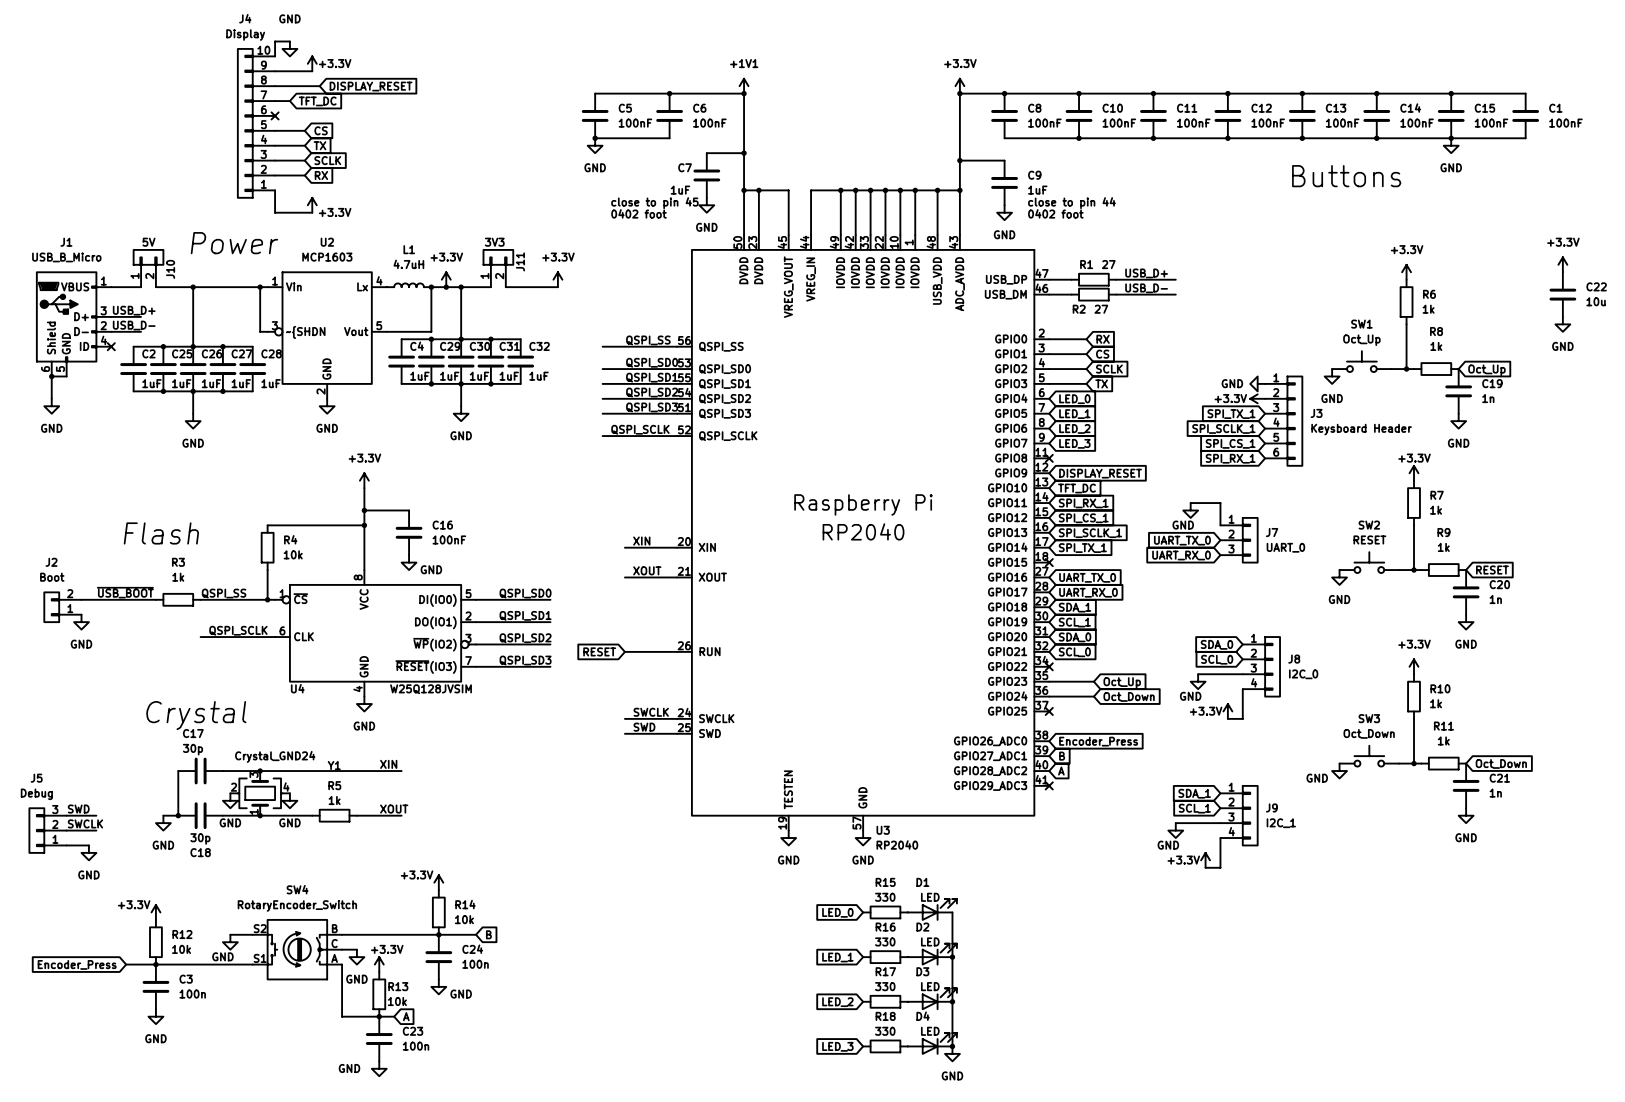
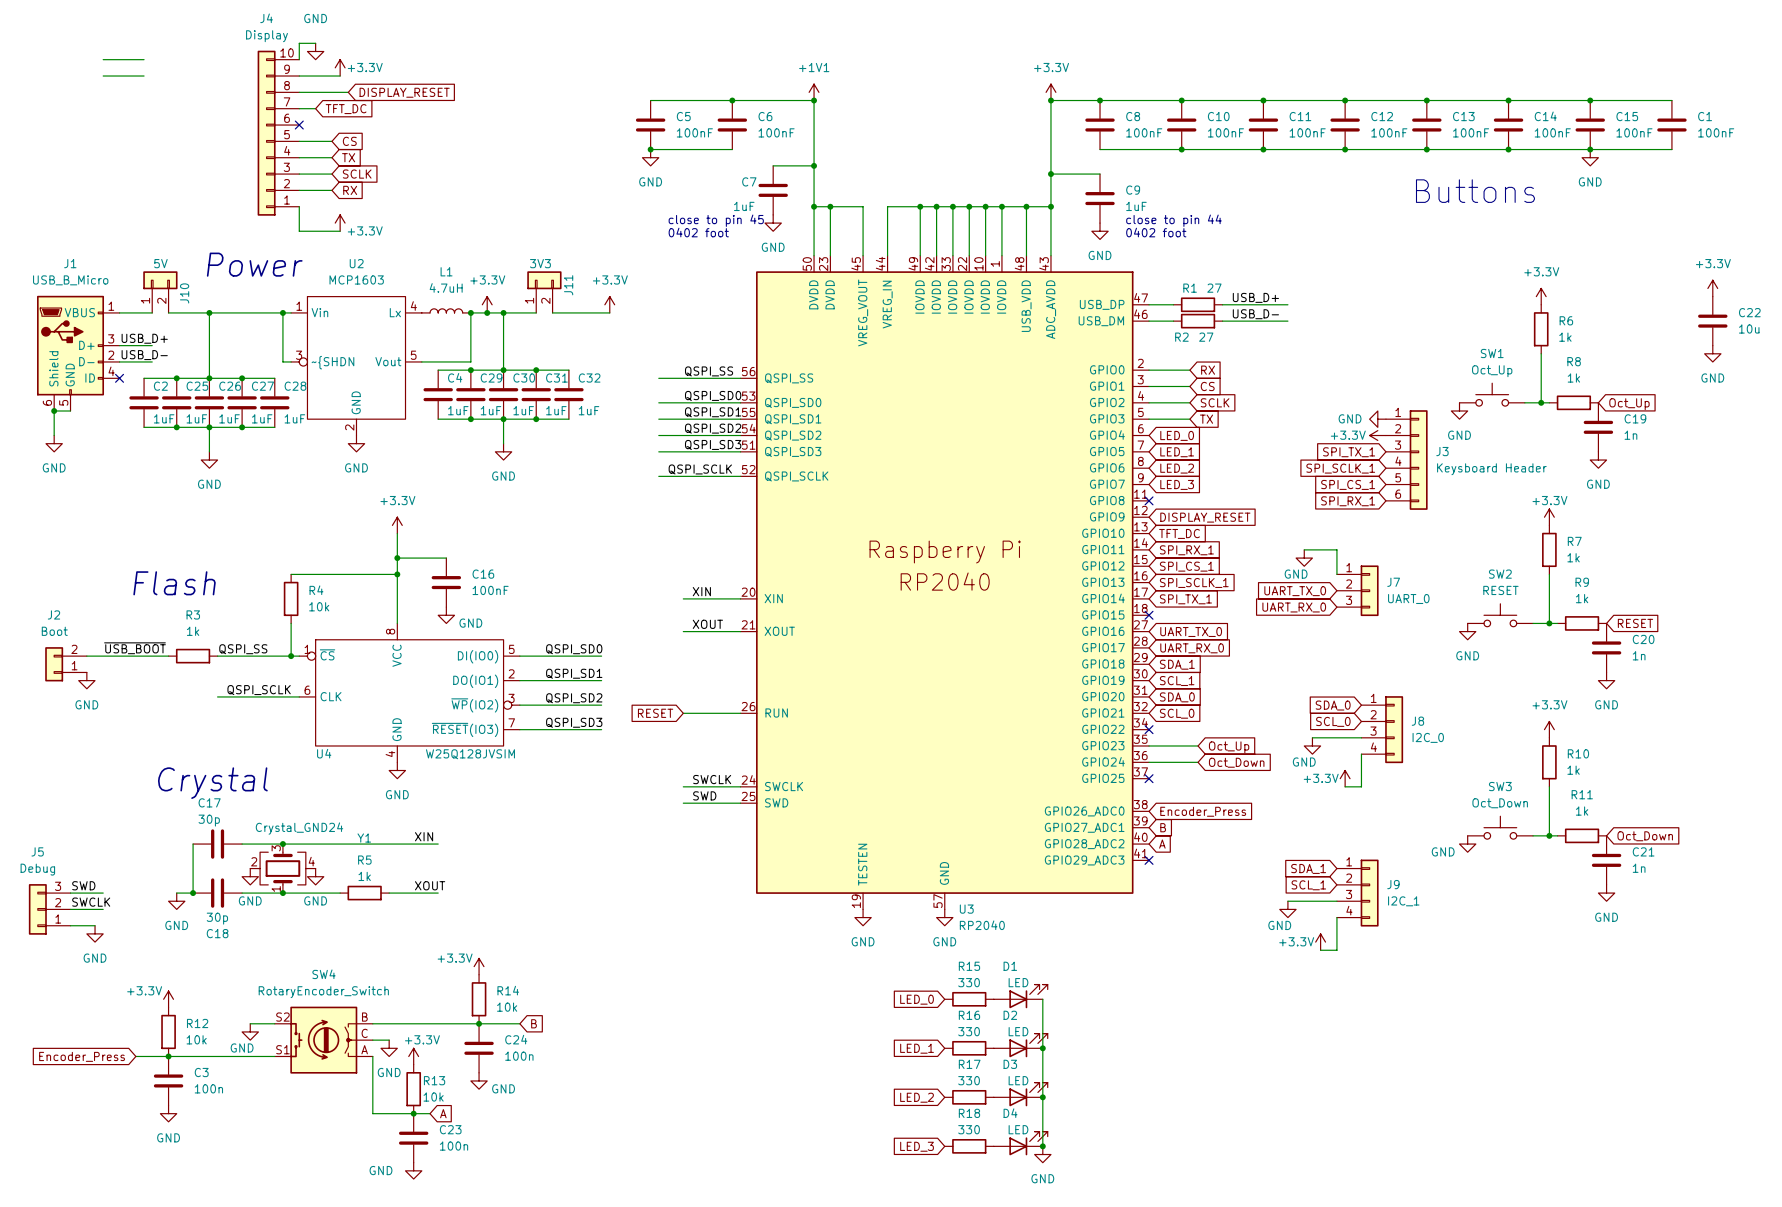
wire: none -> (103, 59) (144, 59)
wire: none -> (103, 76) (144, 76)

